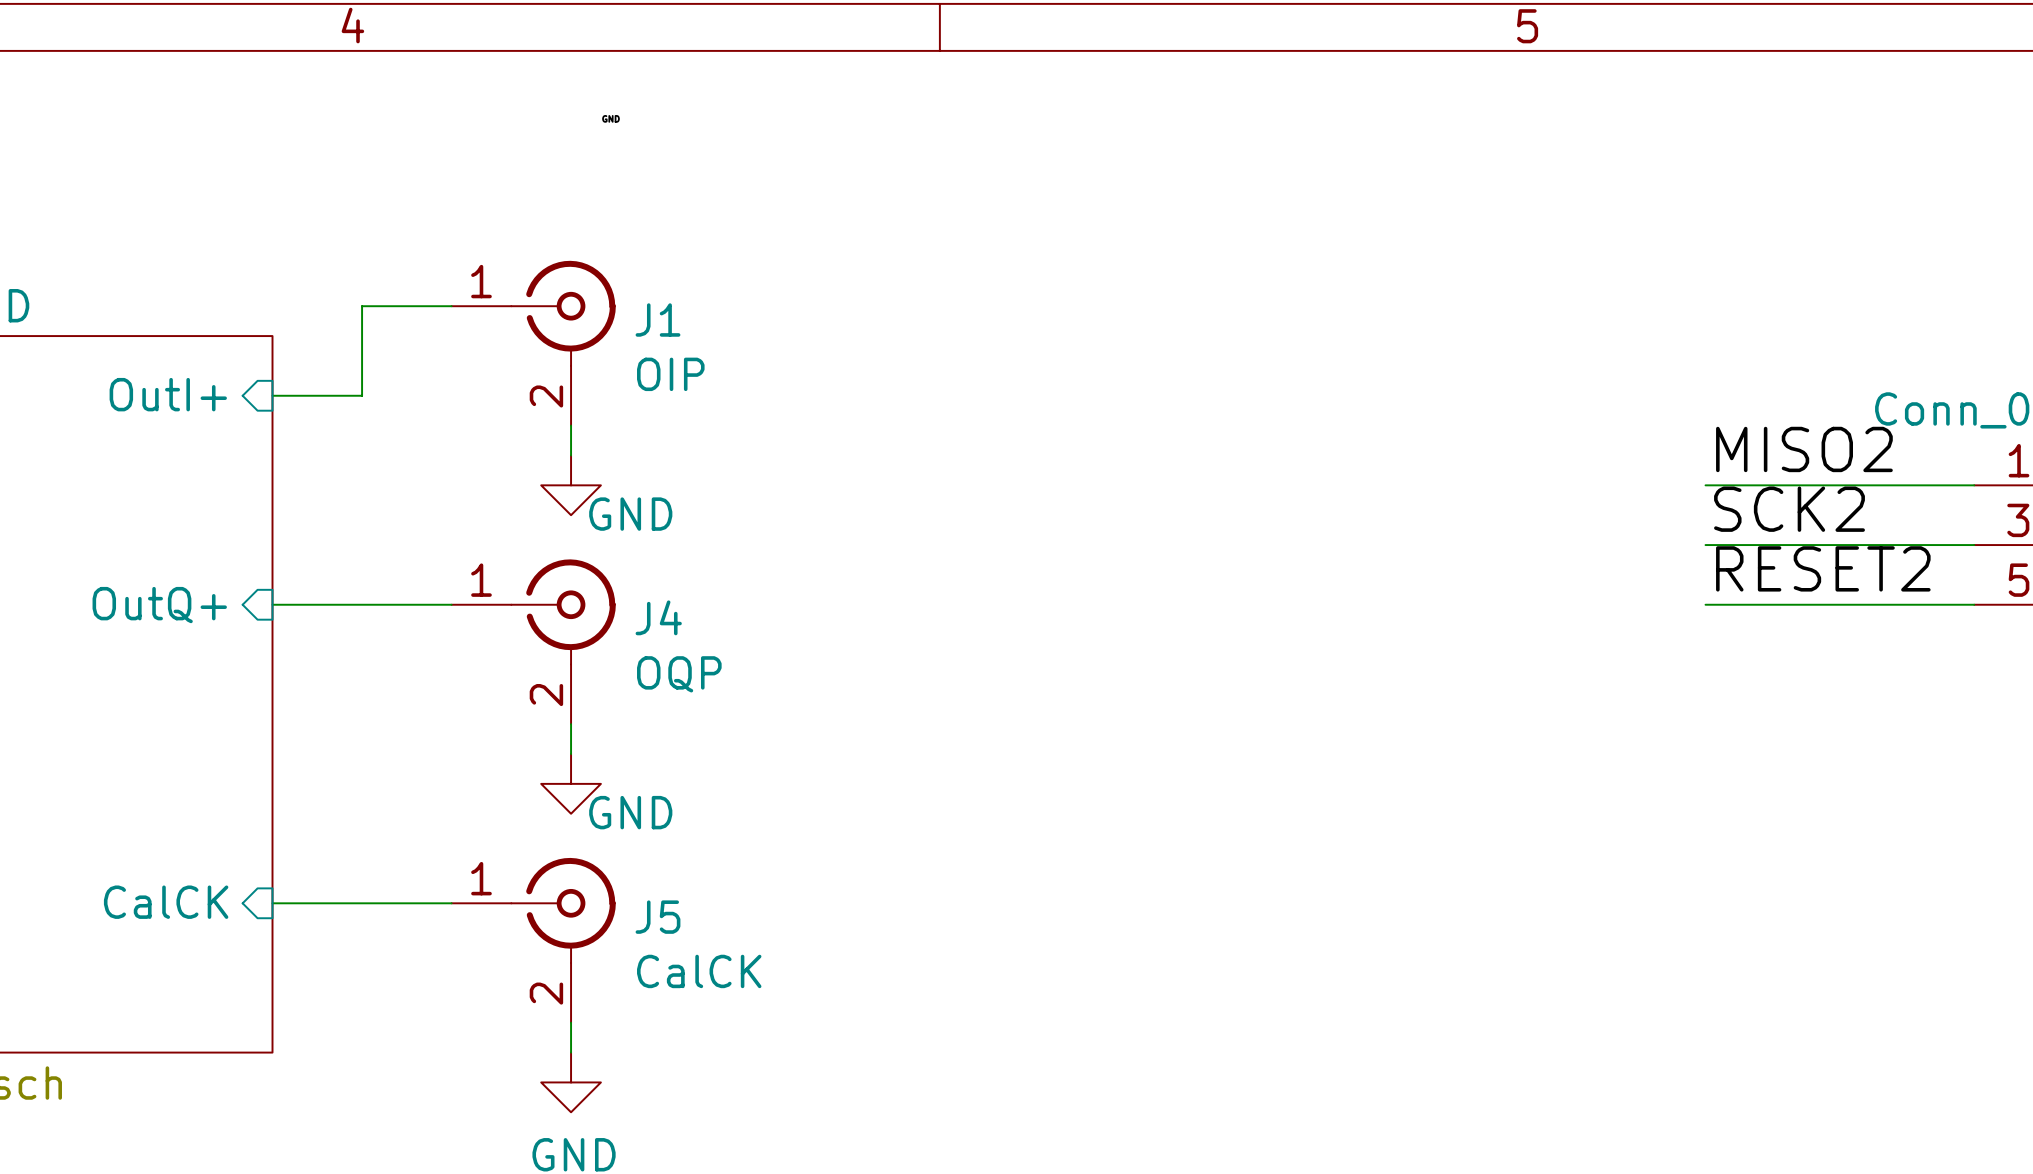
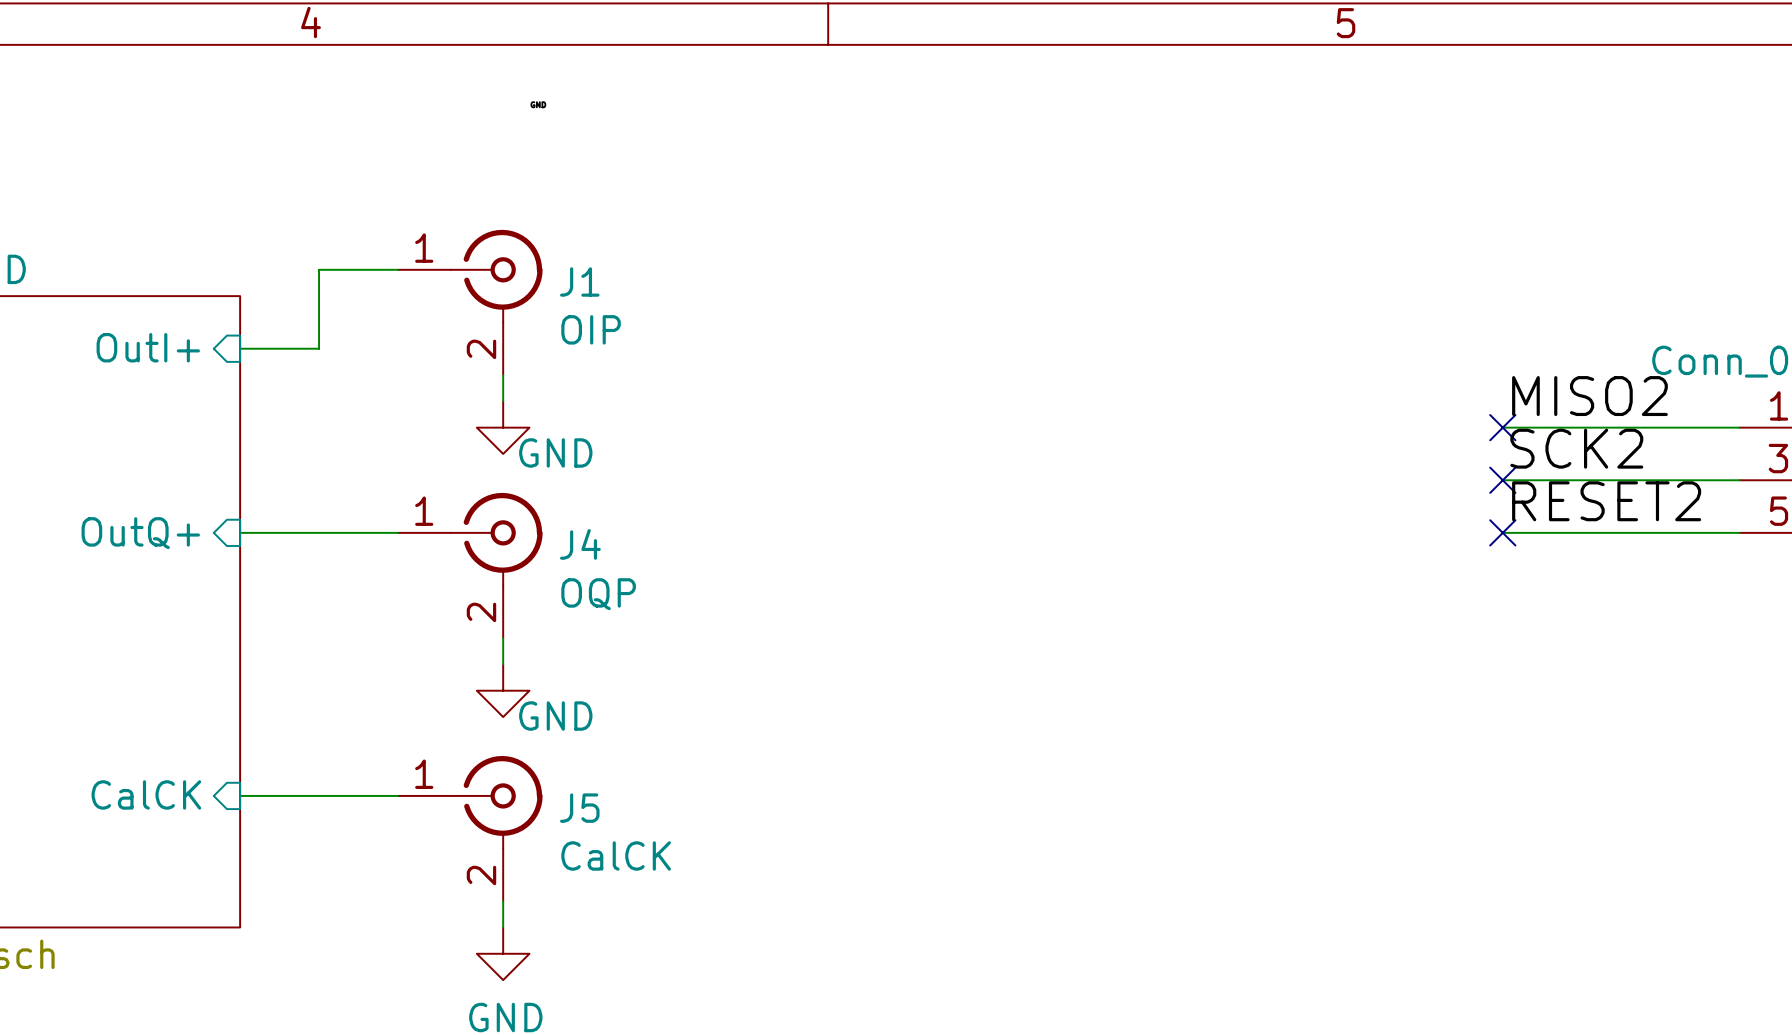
no-connect mark: none -> (1502, 427)
no-connect mark: none -> (1502, 480)
no-connect mark: none -> (1502, 532)

